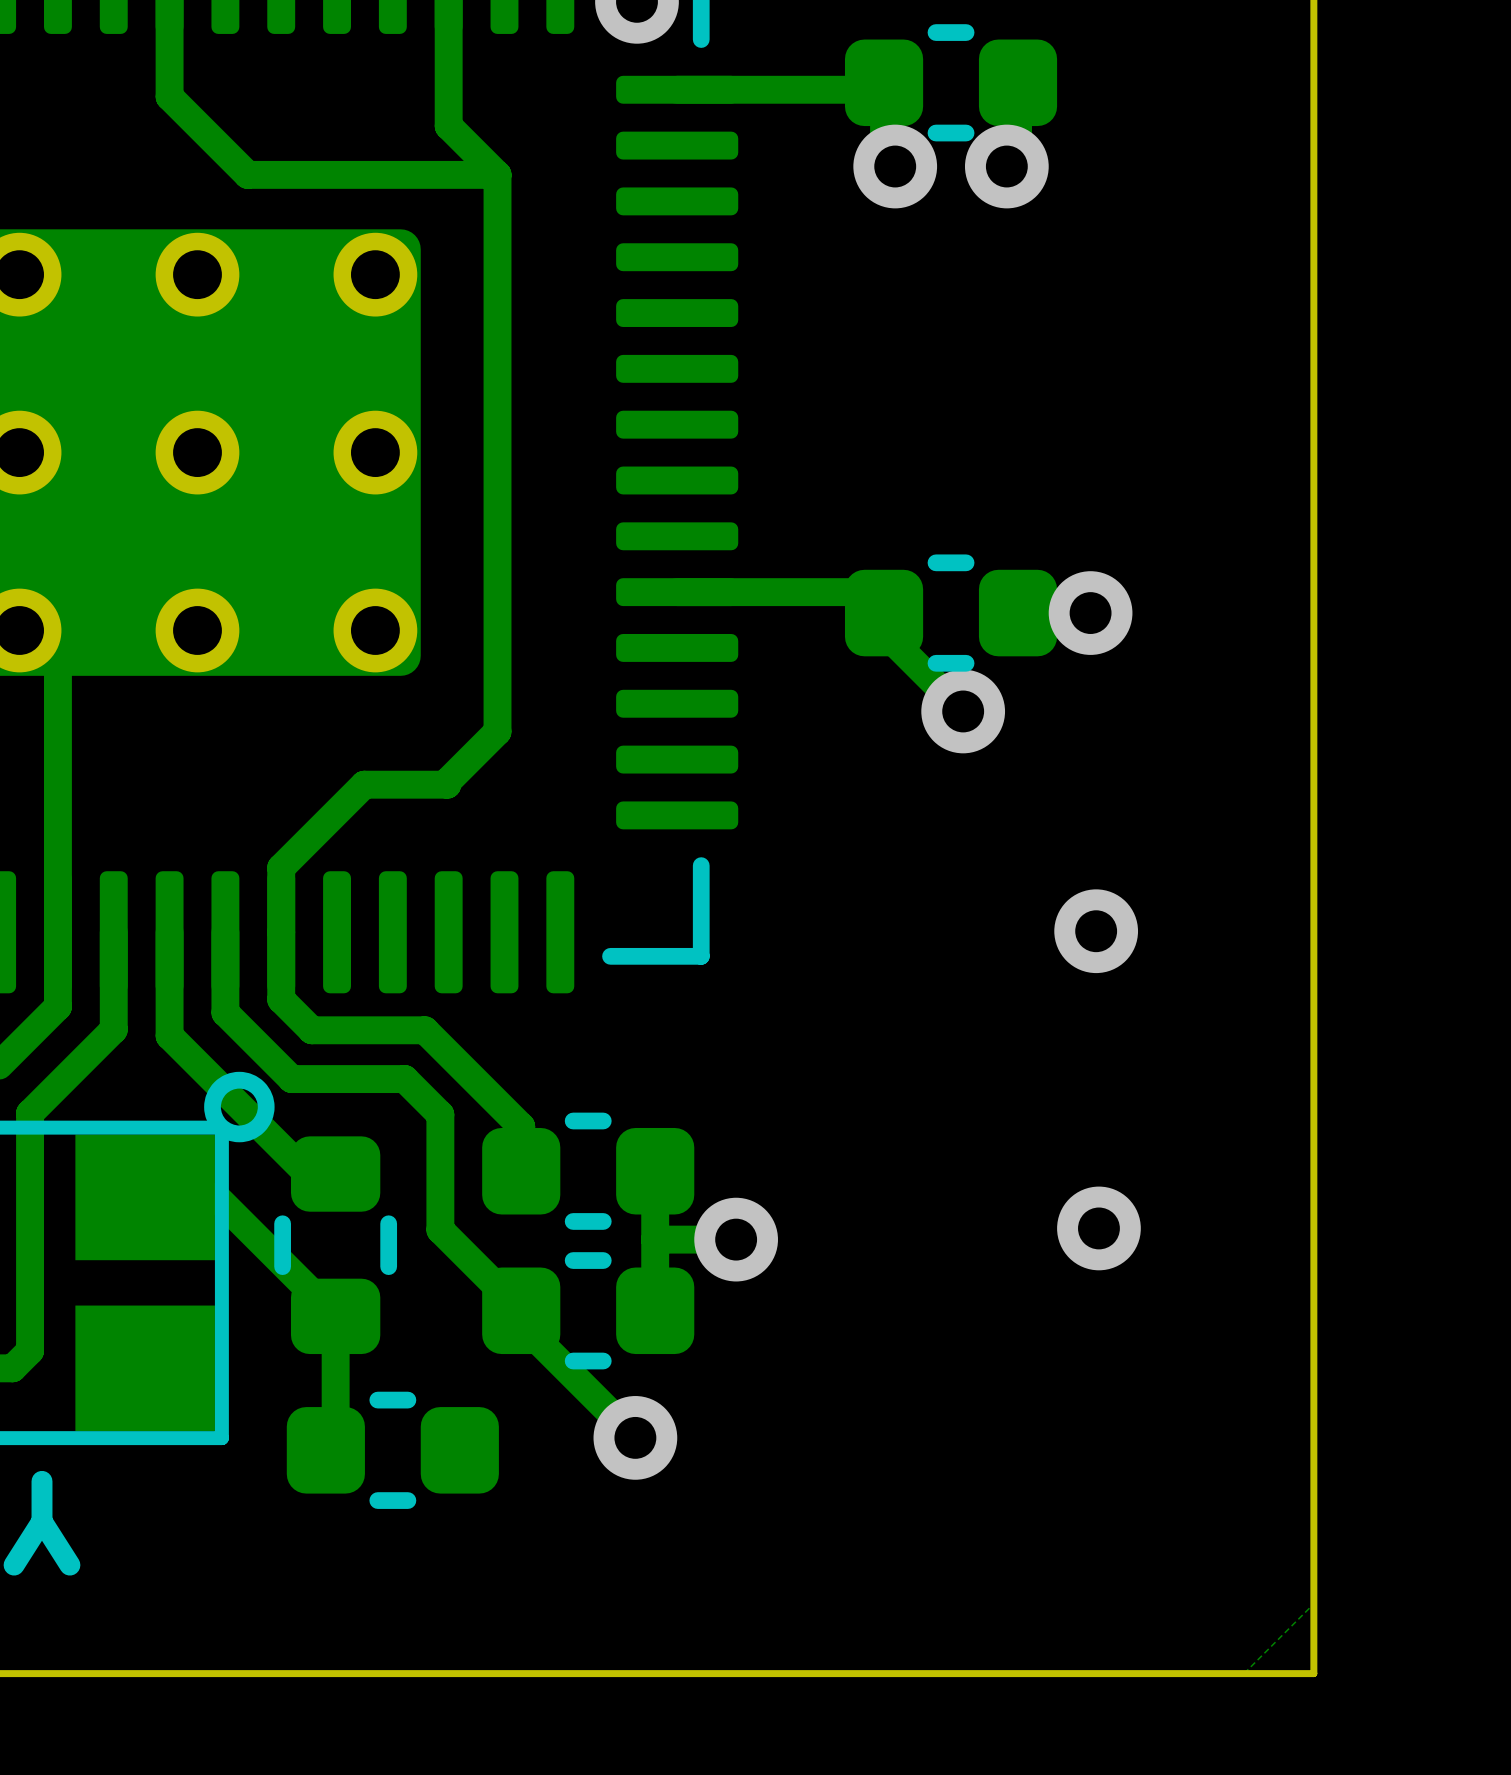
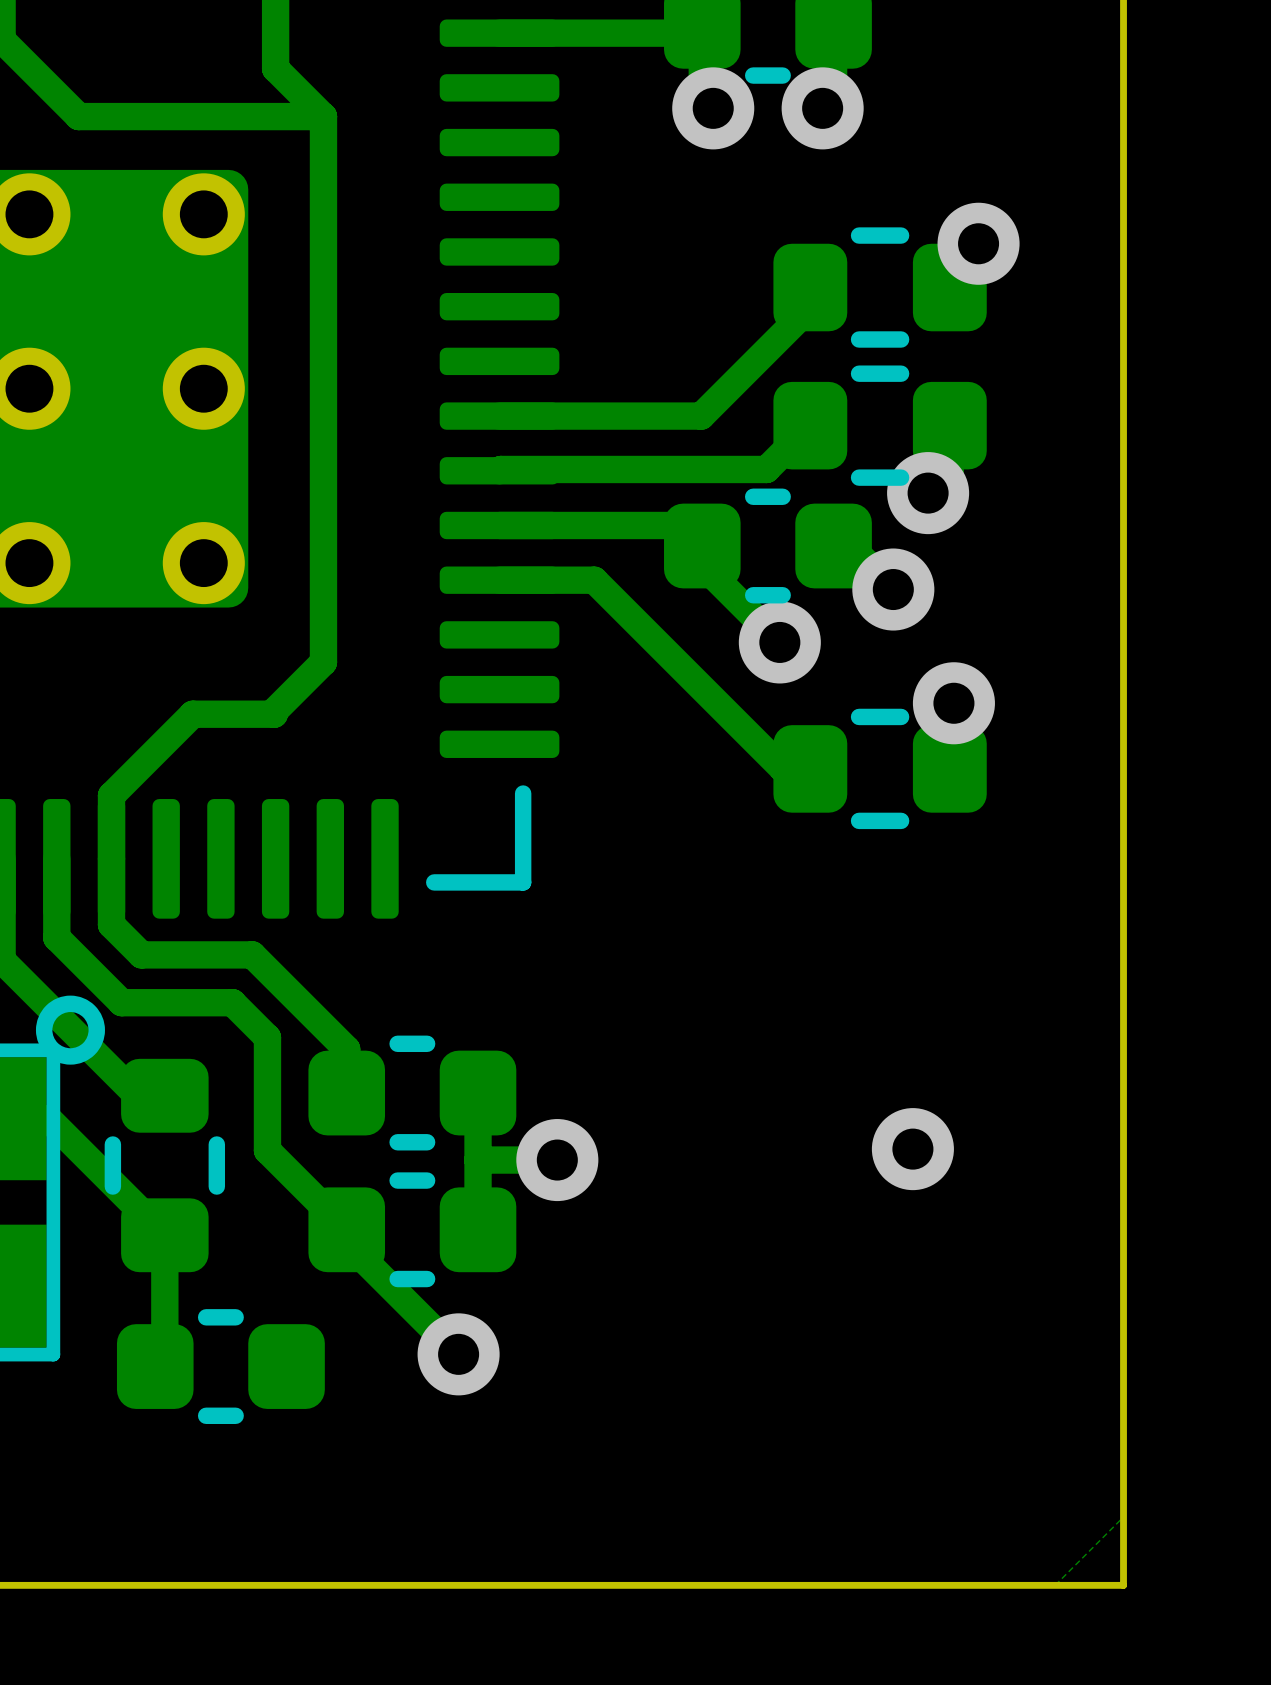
via: none -> (978, 243)
track: none -> (810, 287) (810, 307) (701, 416) (499, 416)
part: none -> (880, 287)
track: none -> (810, 425) (766, 469) (500, 469)
part: none -> (880, 425)
via: none -> (928, 493)
via: (1090, 613) -> none
track: none -> (499, 580) (594, 580) (782, 768) (810, 768)
via: none -> (893, 589)
via: none -> (953, 703)
part: none -> (880, 768)
via: (1096, 931) -> none

